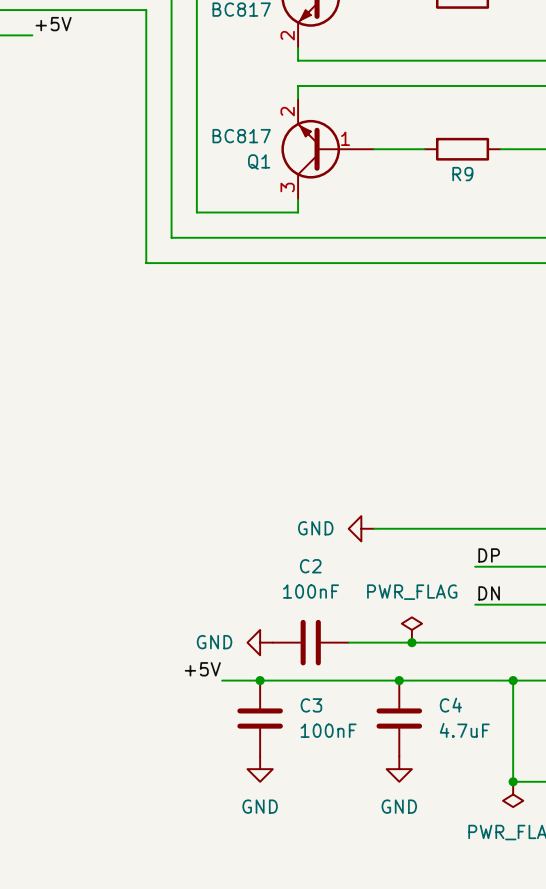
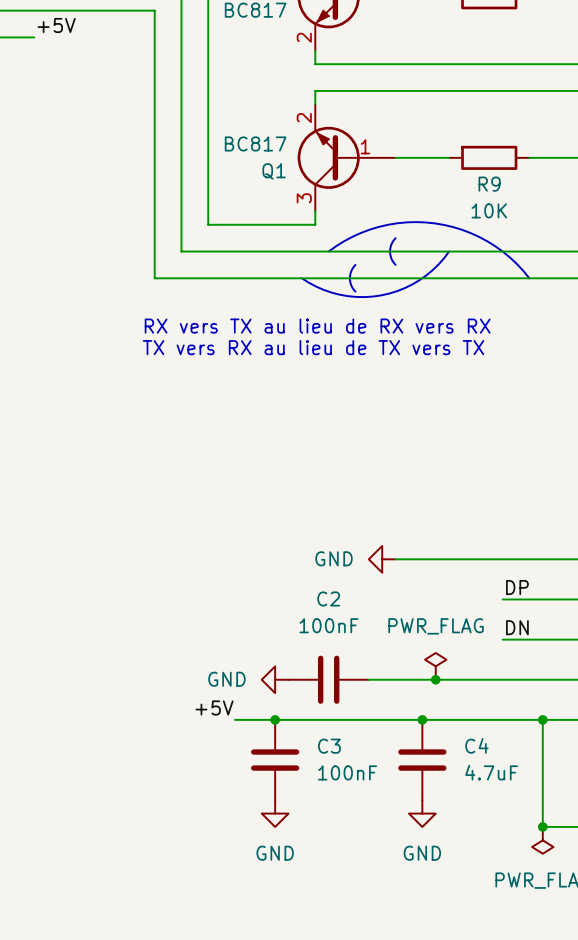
R9 value: none -> 10K (489, 210)
line: none -> (395, 238) (390, 251) (395, 264)
line: none -> (328, 251) (352, 236) (378, 226) (406, 222) (434, 223) (461, 229) (487, 241) (510, 257) (529, 278)
line: none -> (449, 251) (432, 270) (419, 280) (404, 288) (381, 295) (356, 296) (339, 294) (323, 289) (301, 278)
line: none -> (355, 264) (349, 278) (355, 291)
text: none -> RX vers TX au lieu de RX vers RX (317, 326)
text: none -> TX vers RX au lieu de TX vers TX (313, 347)

